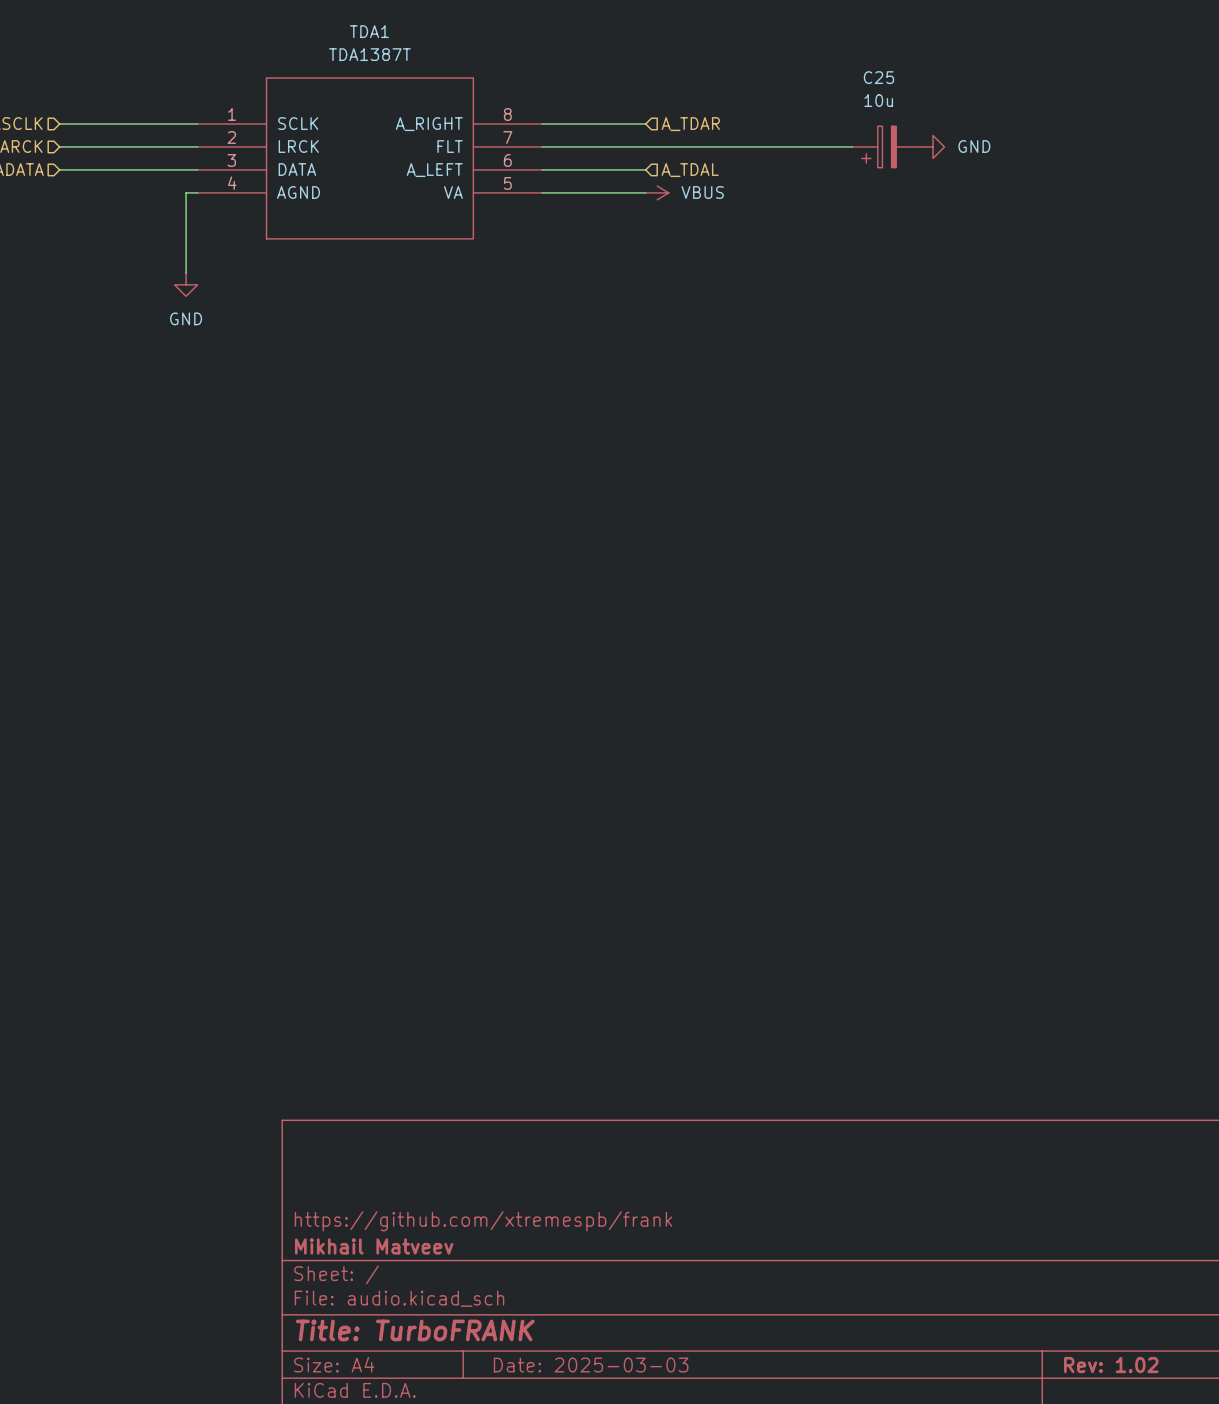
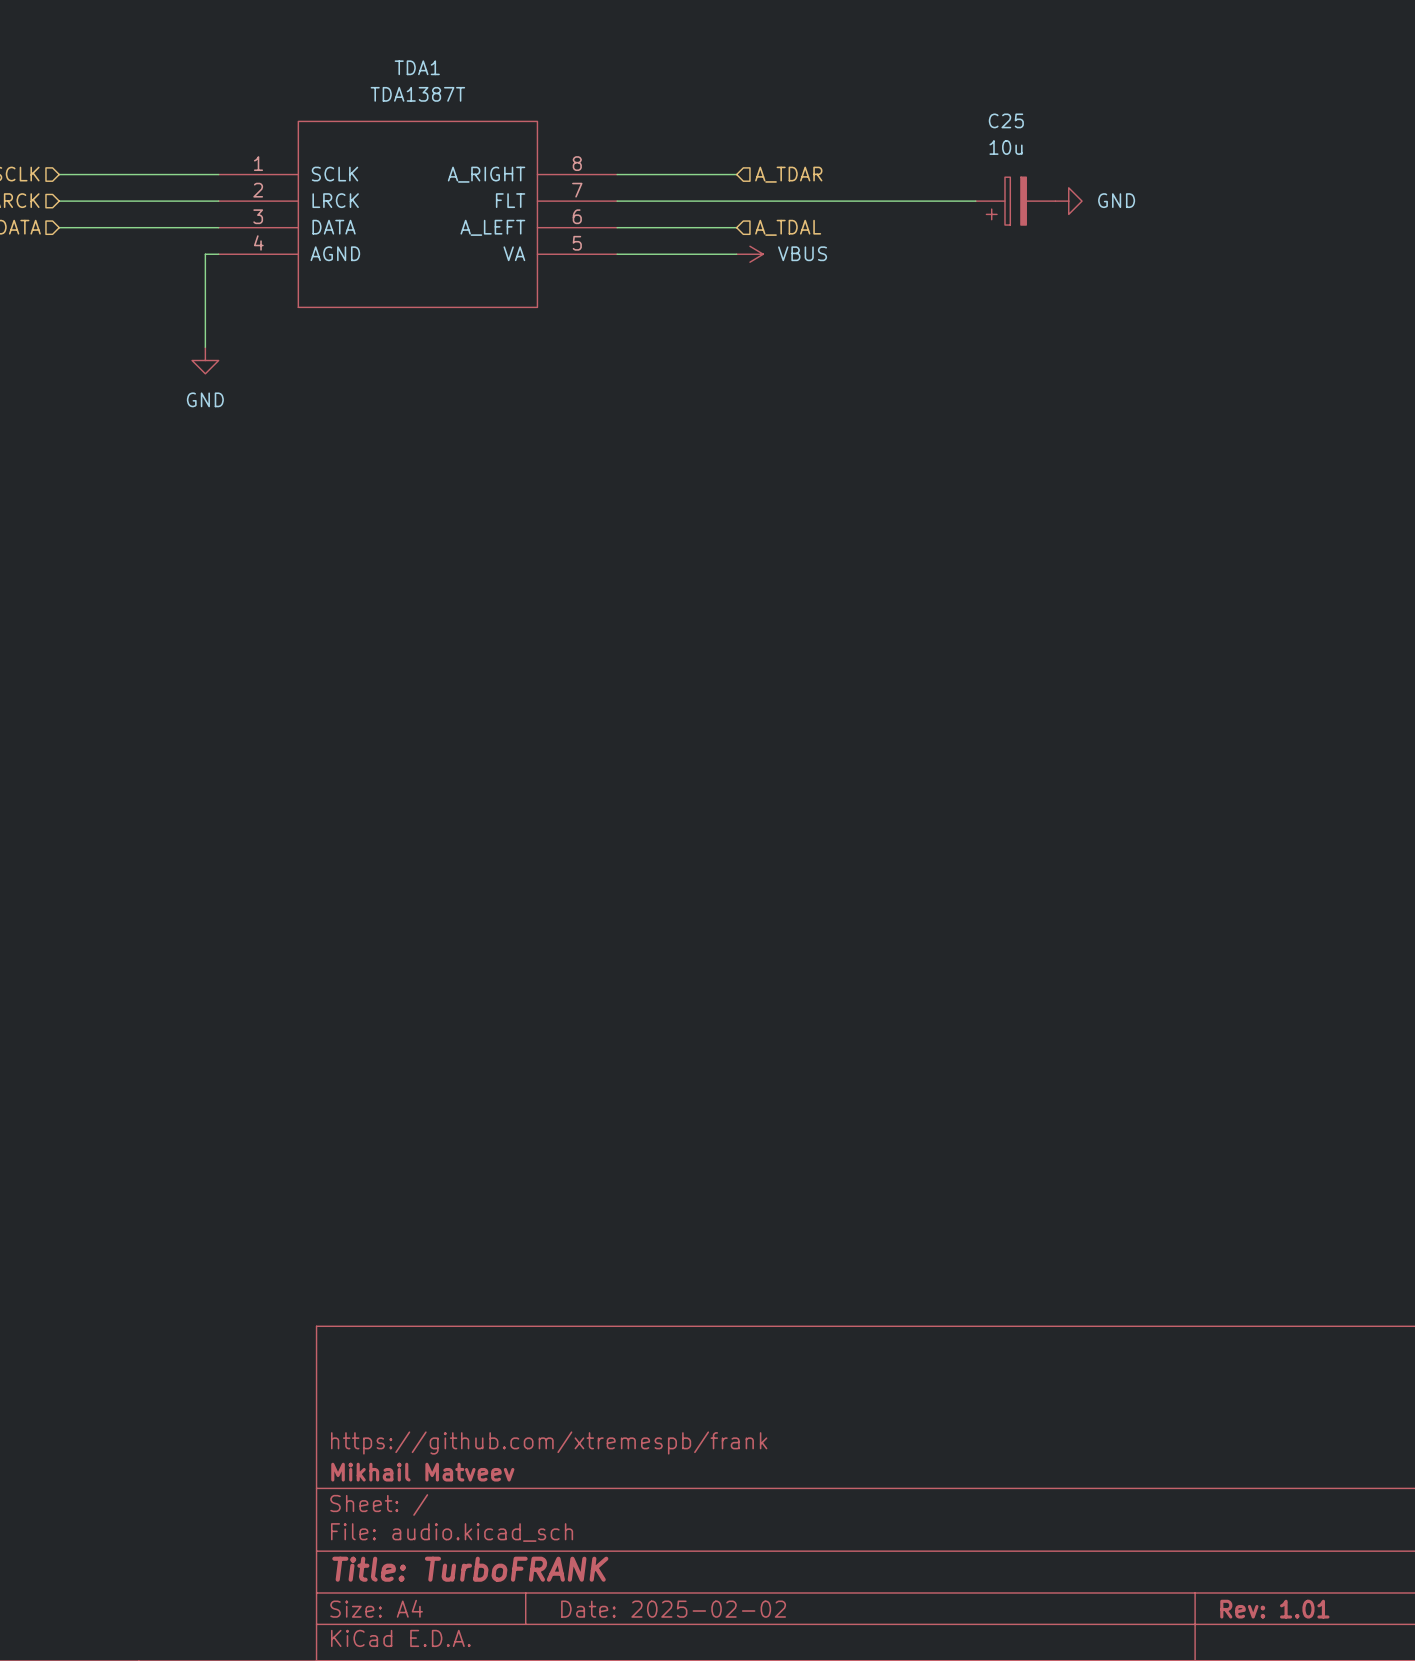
title block: Date: 2025-03-03 (591, 1365) -> Date: 2025-02-02 (673, 1609)
title block: Rev: 1.02 (1111, 1365) -> Rev: 1.01 (1274, 1609)

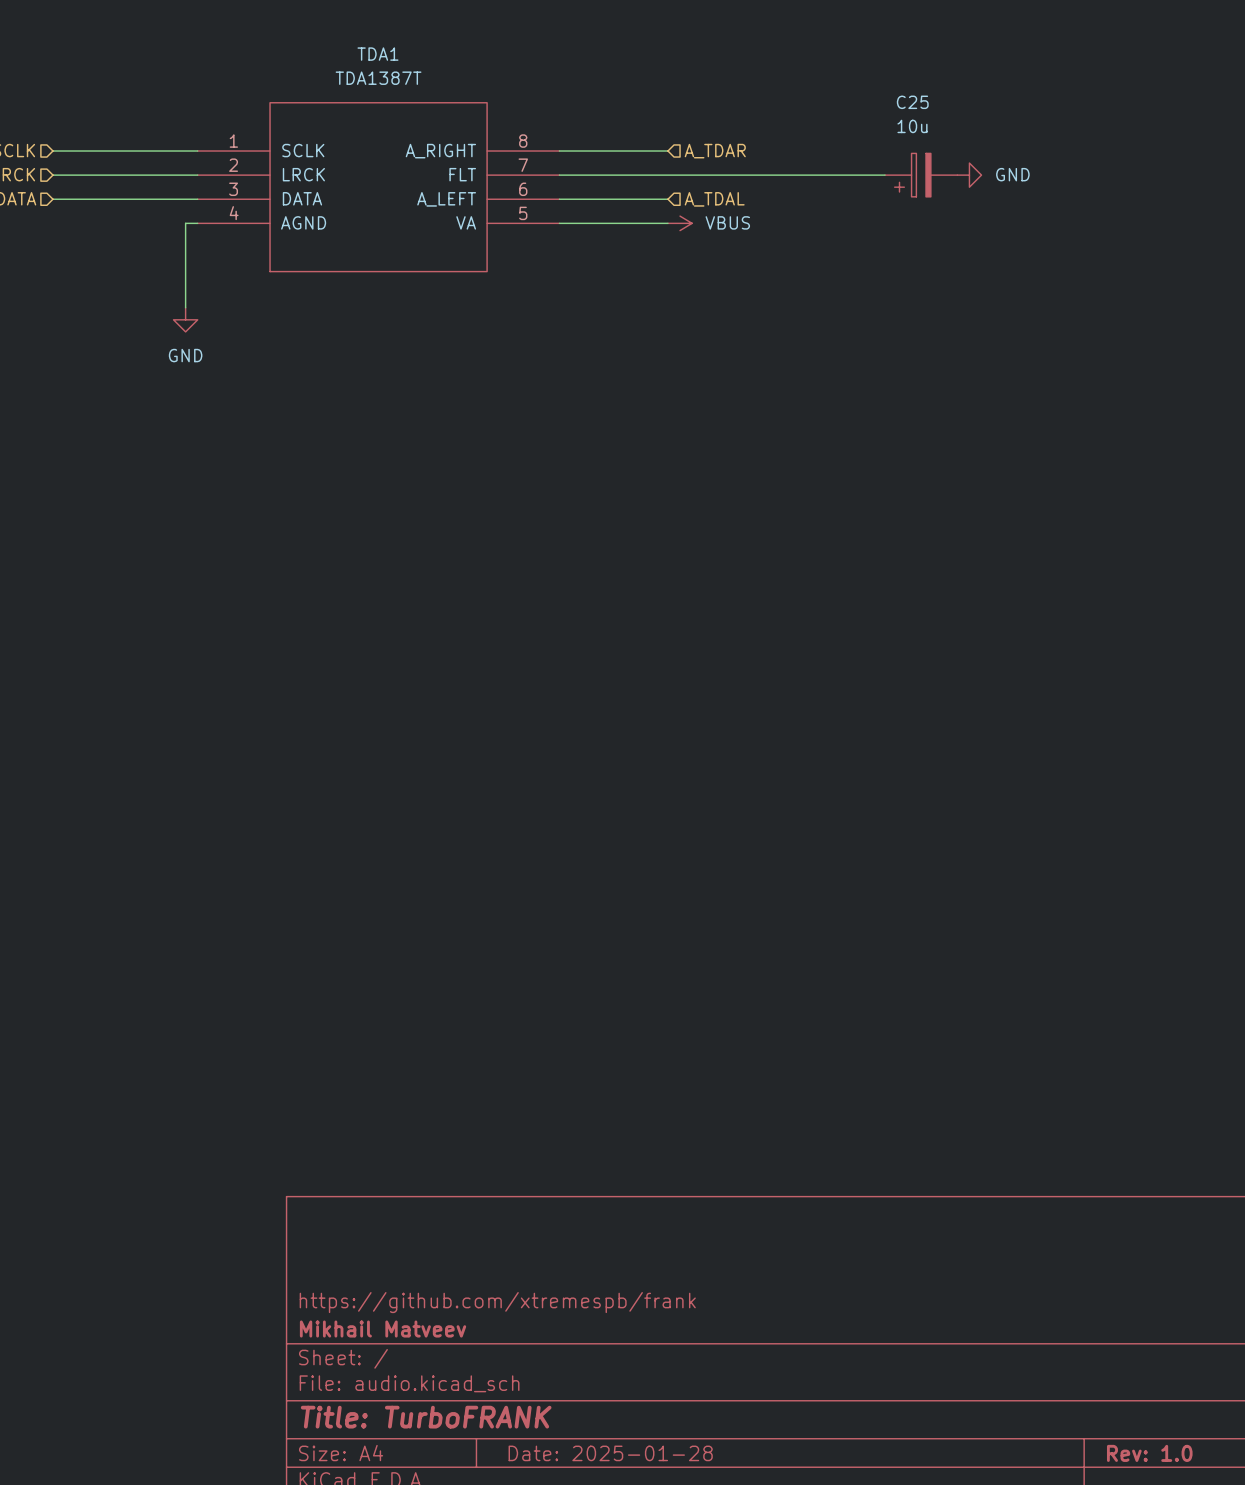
title block: Date: 2025-02-02 (673, 1609) -> Date: 2025-01-28 (610, 1453)
title block: Rev: 1.01 (1274, 1609) -> Rev: 1.0 (1149, 1453)

